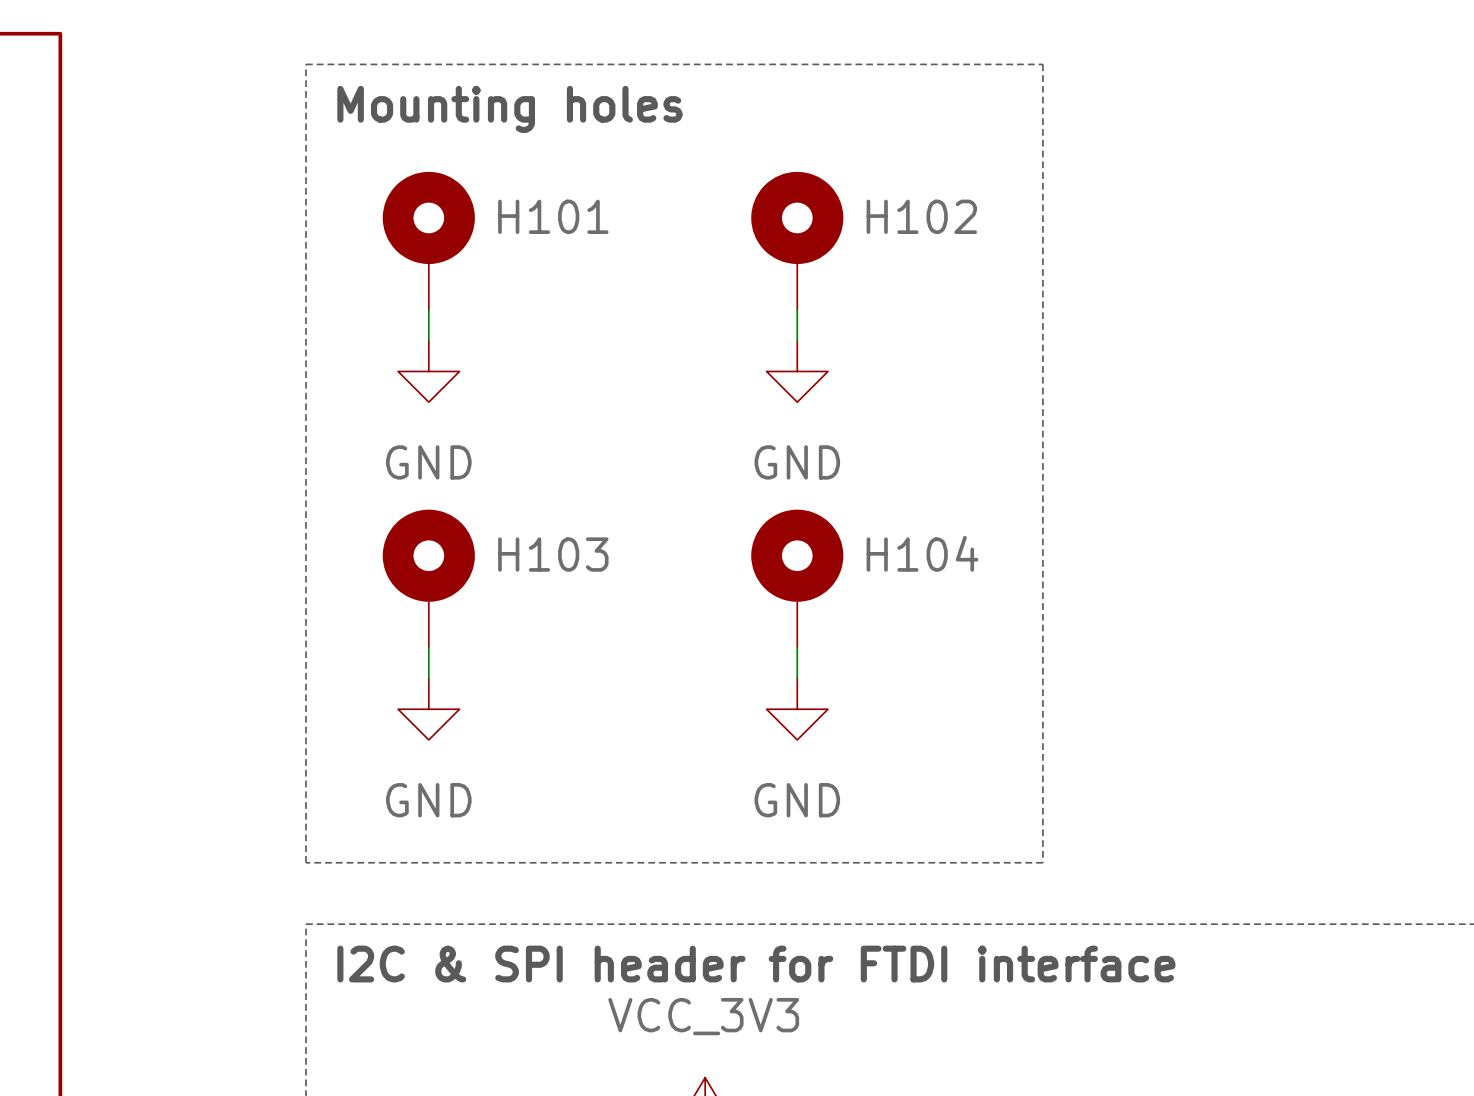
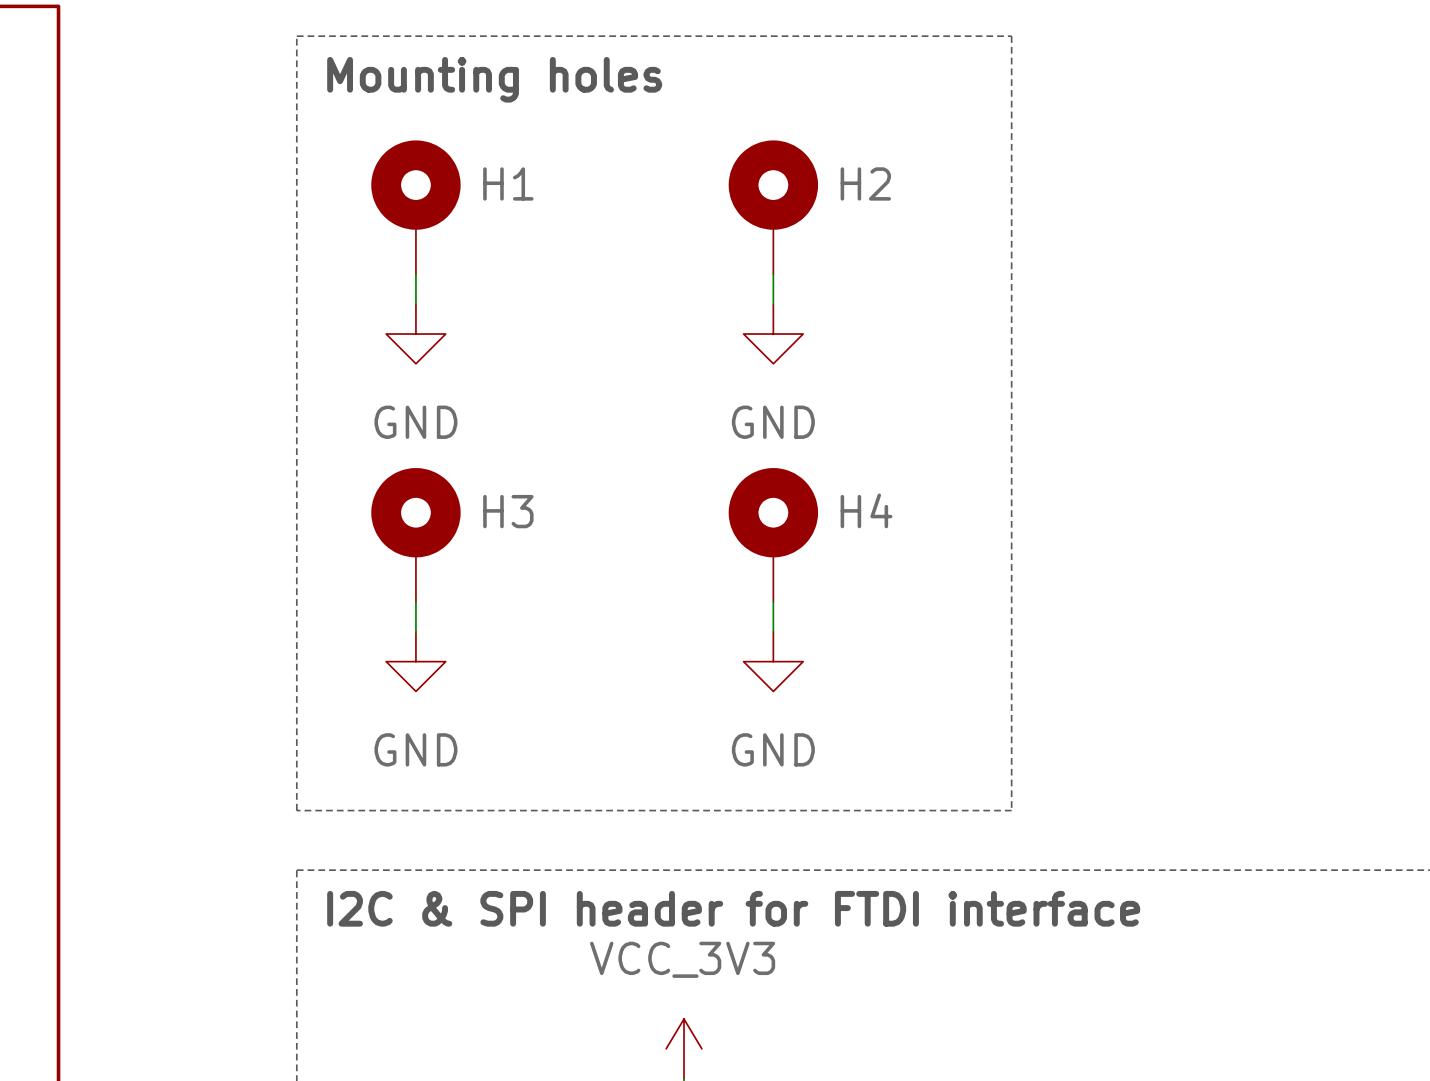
H101 name: H101 (553, 216) -> H1 (508, 183)
H102 name: H102 (921, 216) -> H2 (865, 183)
H104 name: H104 (922, 553) -> H4 (866, 510)
H103 name: H103 (553, 554) -> H3 (508, 511)

